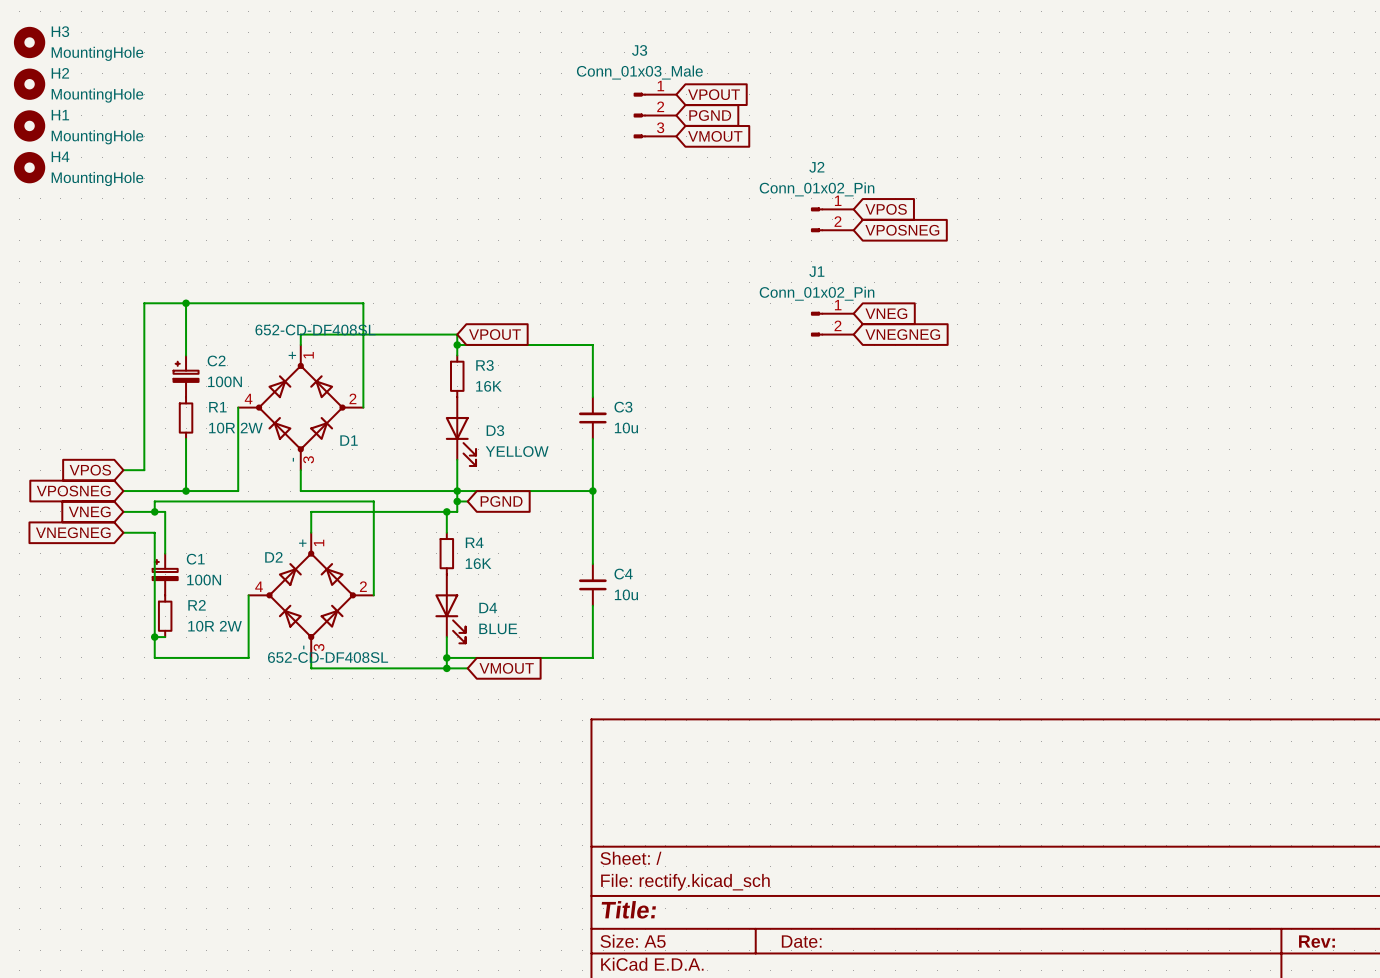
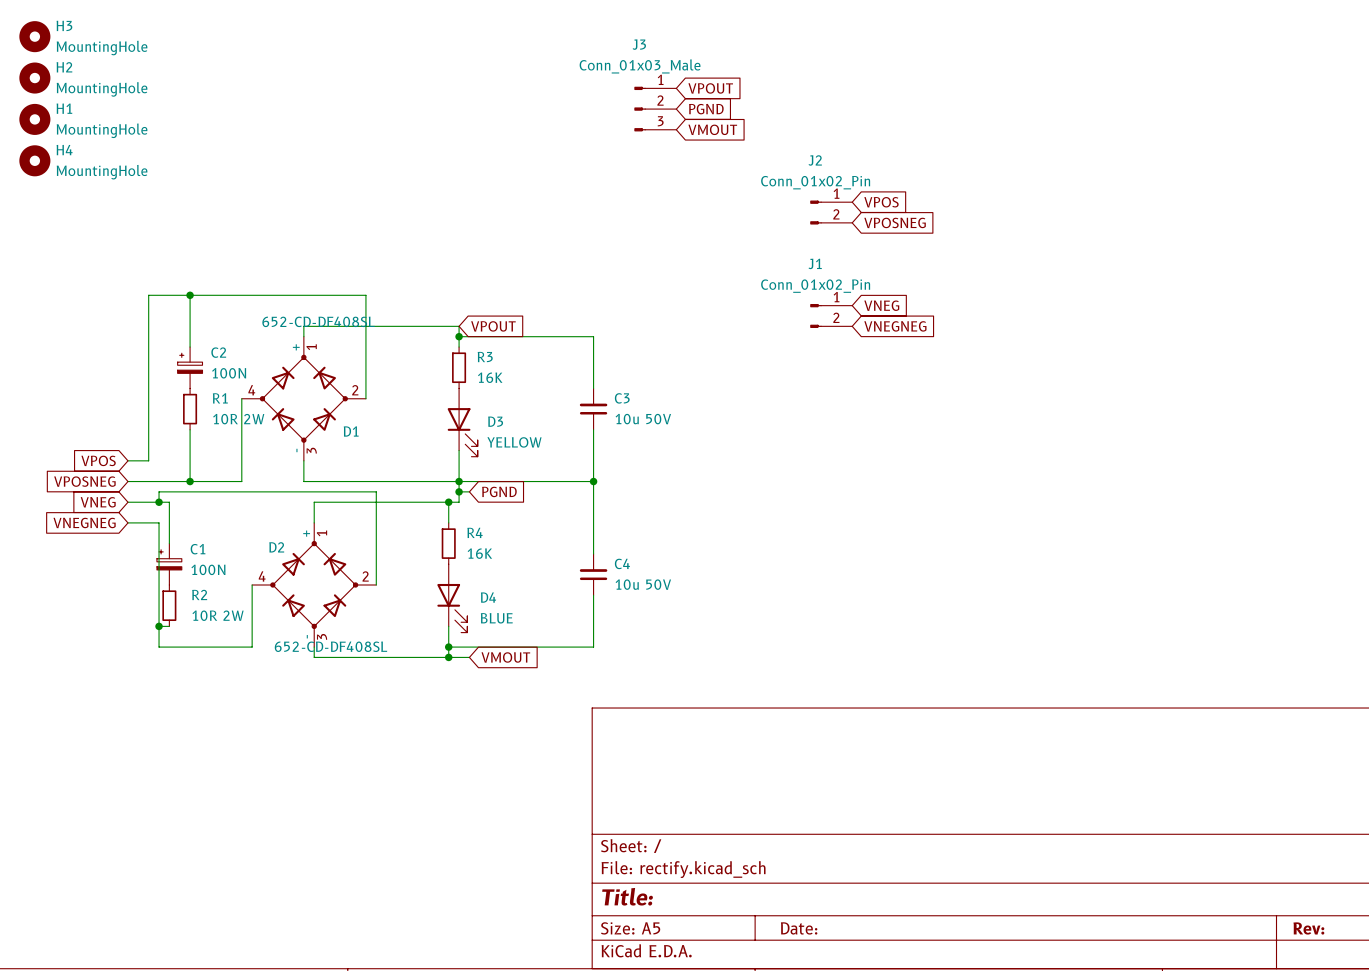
C3 value: 10u (626, 428) -> 10u 50V (643, 419)
C4 value: 10u (626, 594) -> 10u 50V (643, 584)

